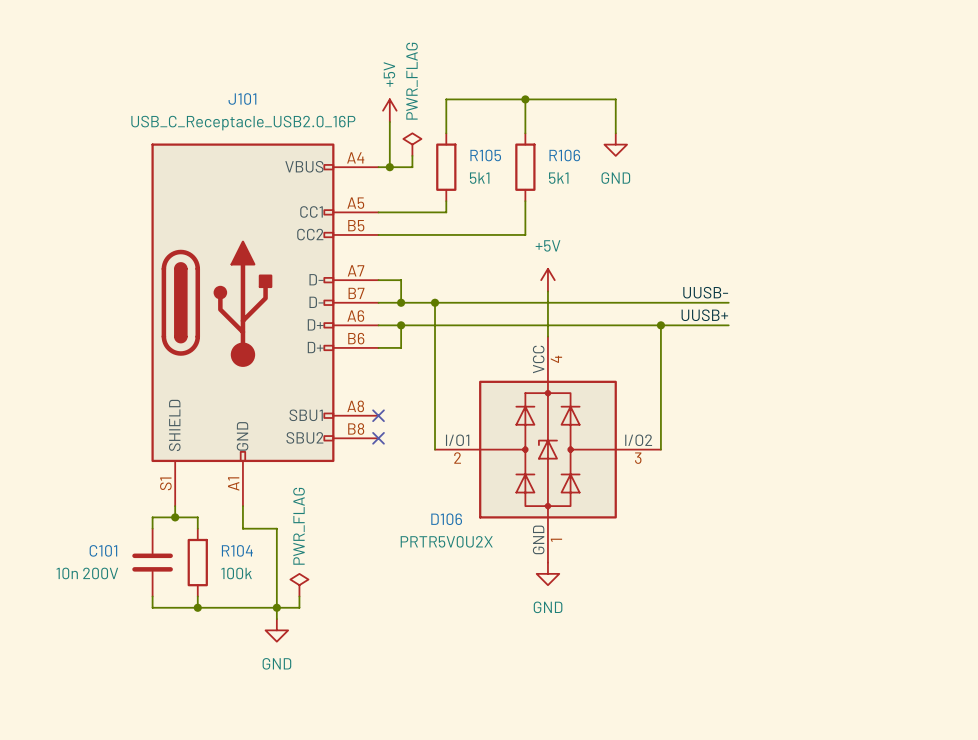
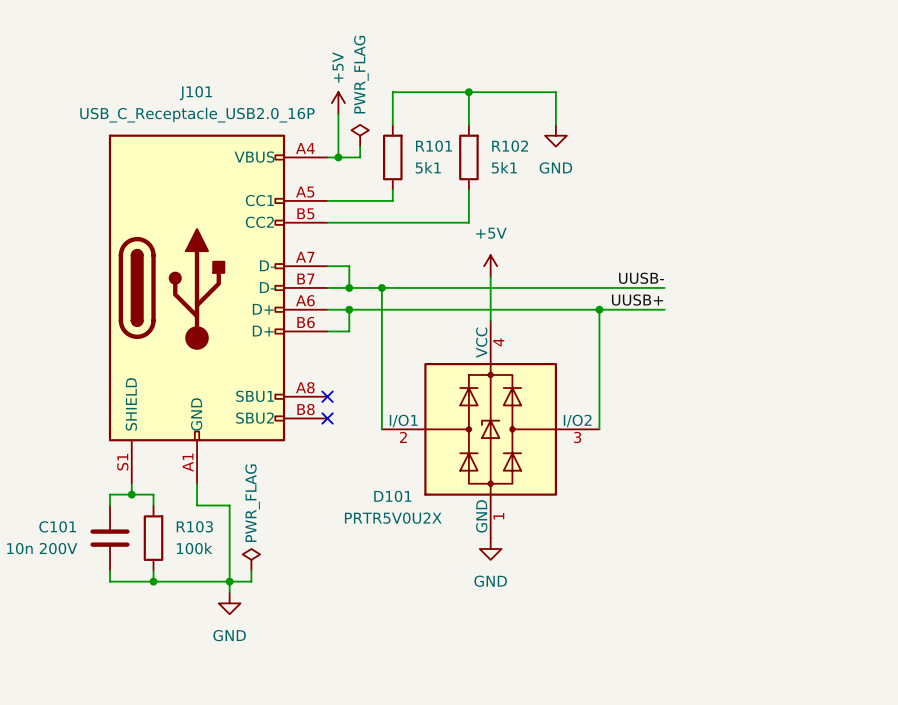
R105 name: R105 (485, 155) -> R101 (434, 146)
R106 name: R106 (564, 155) -> R102 (510, 146)
D106 name: D106 (446, 519) -> D101 (392, 496)
R104 name: R104 (237, 550) -> R103 (194, 526)

